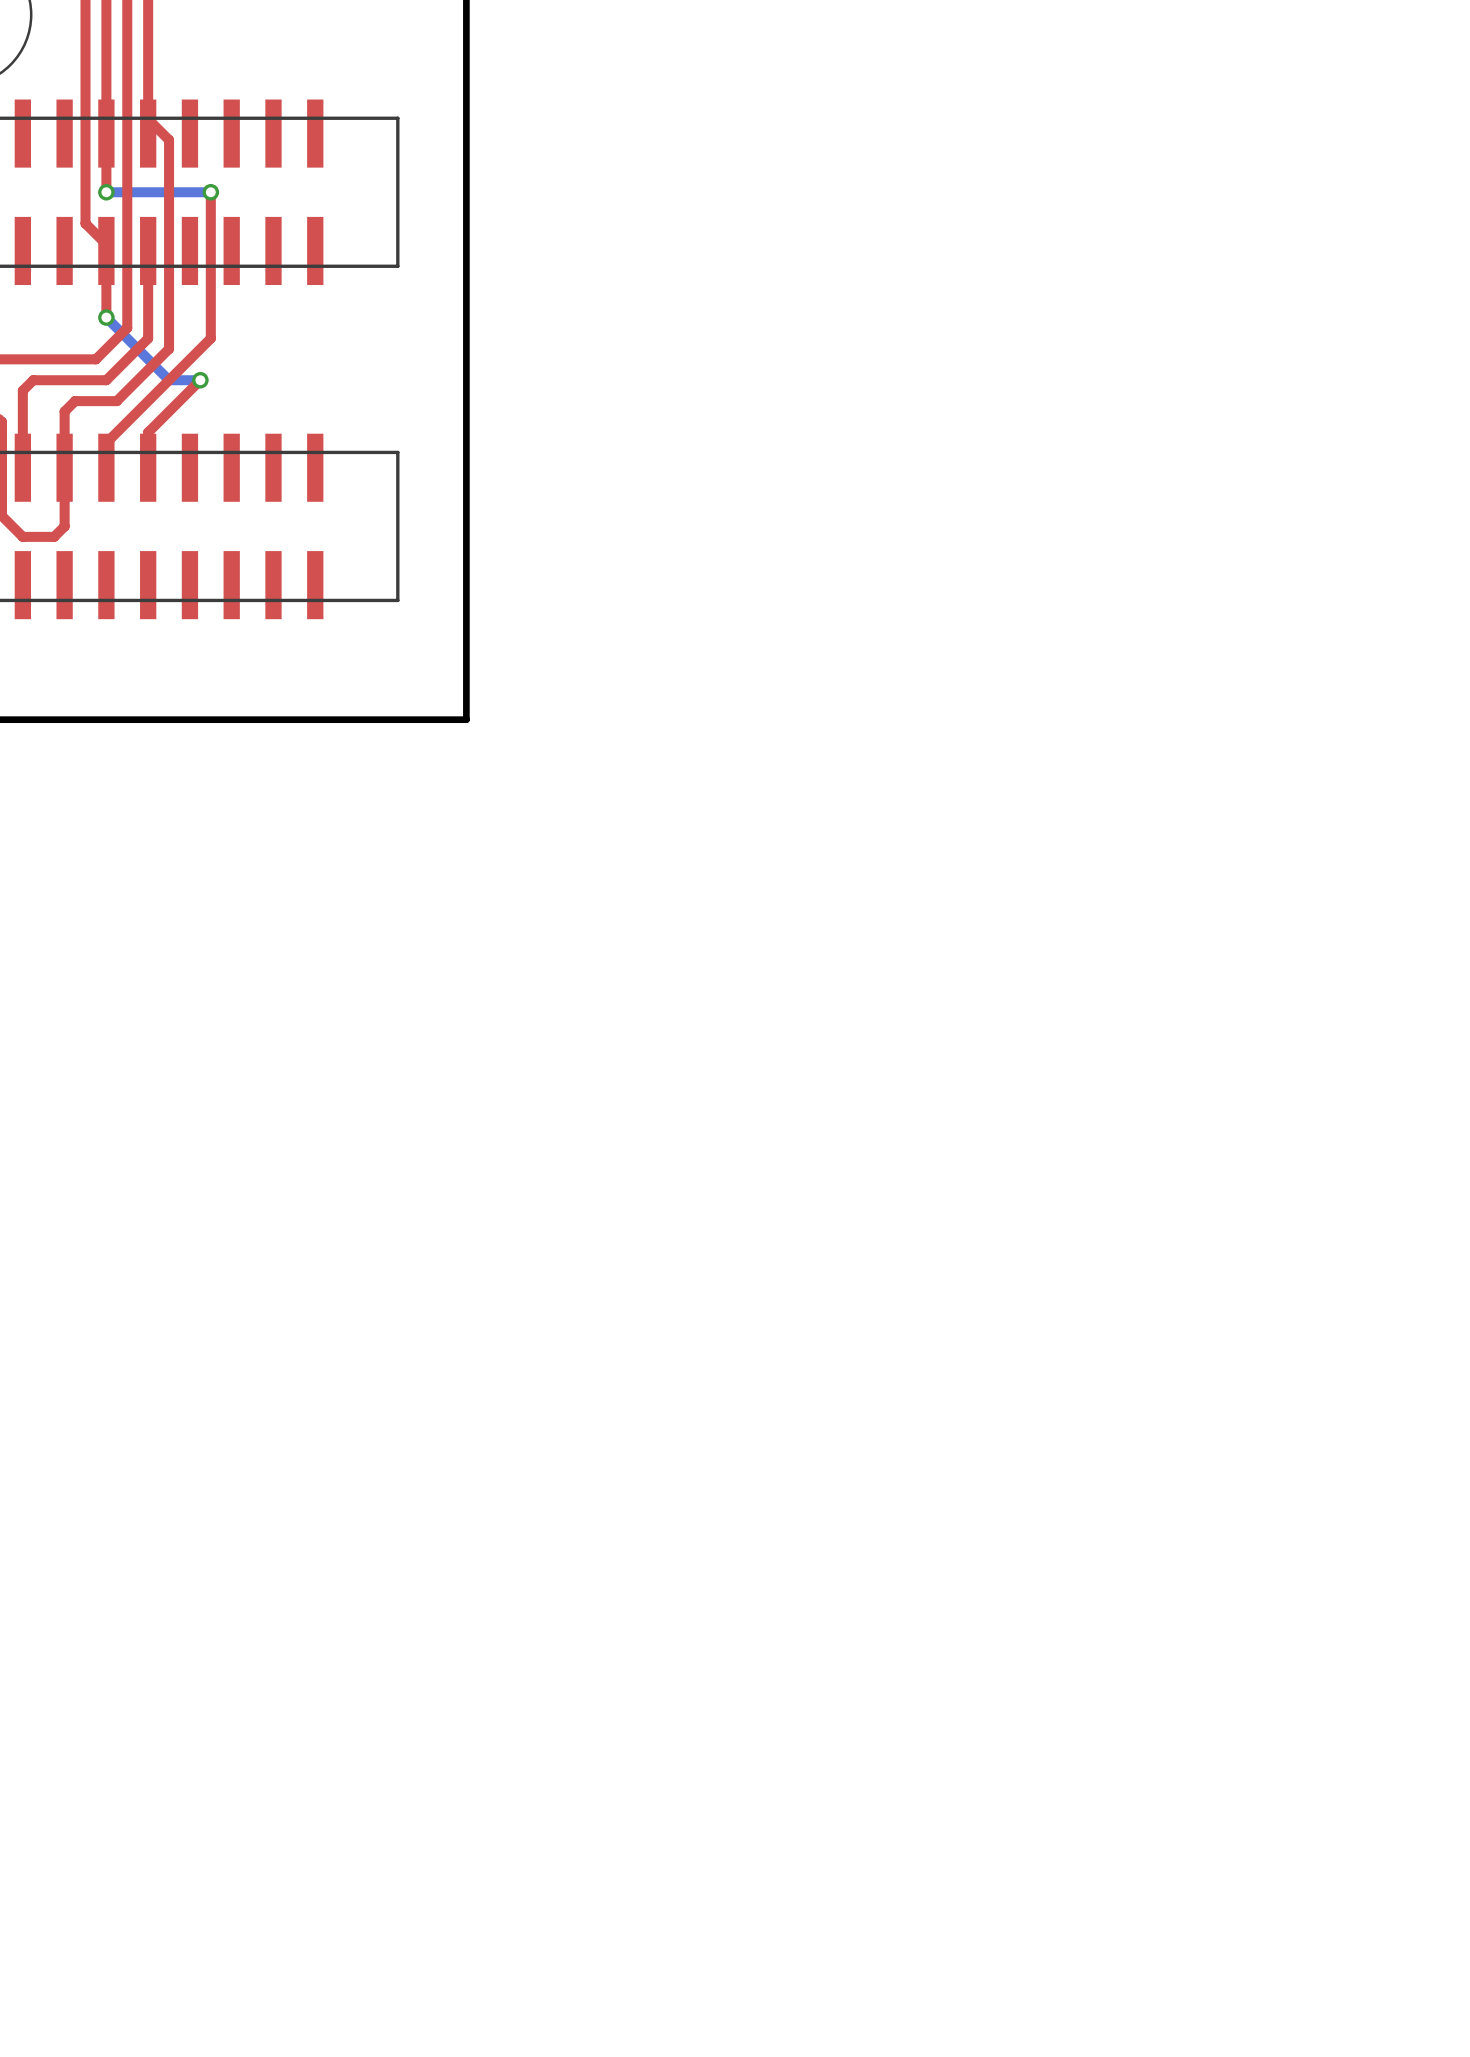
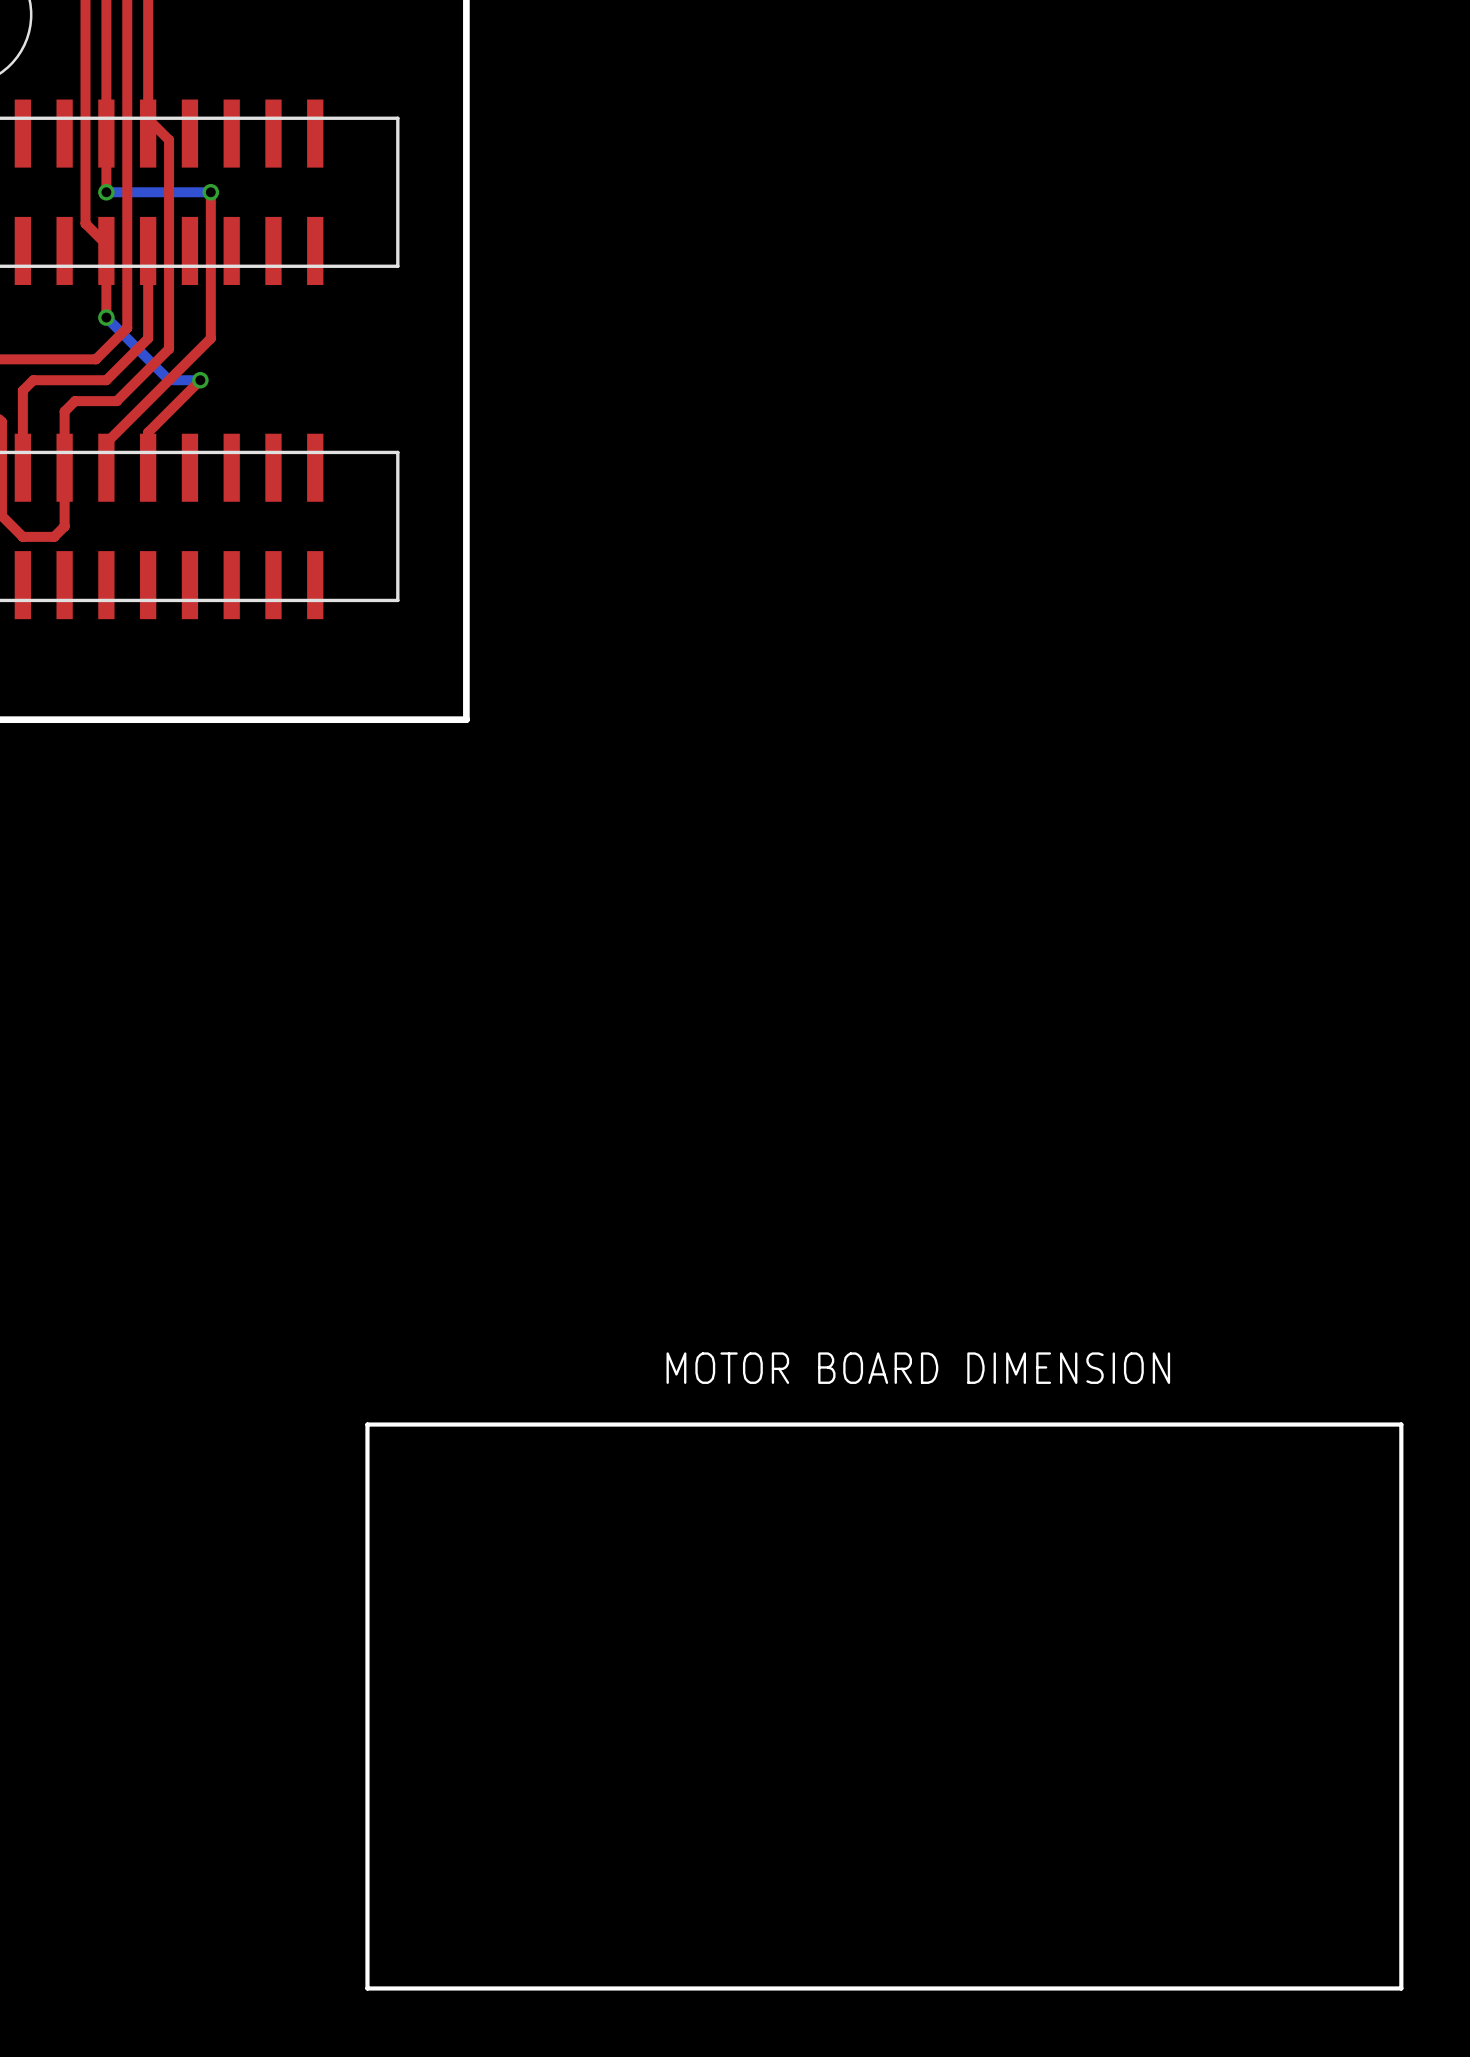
text: none -> MOTOR BOARD DIMENSION (918, 1368)
board edge: none -> (367, 1424) (367, 1988) (1401, 1988) (1401, 1424) (367, 1424)

